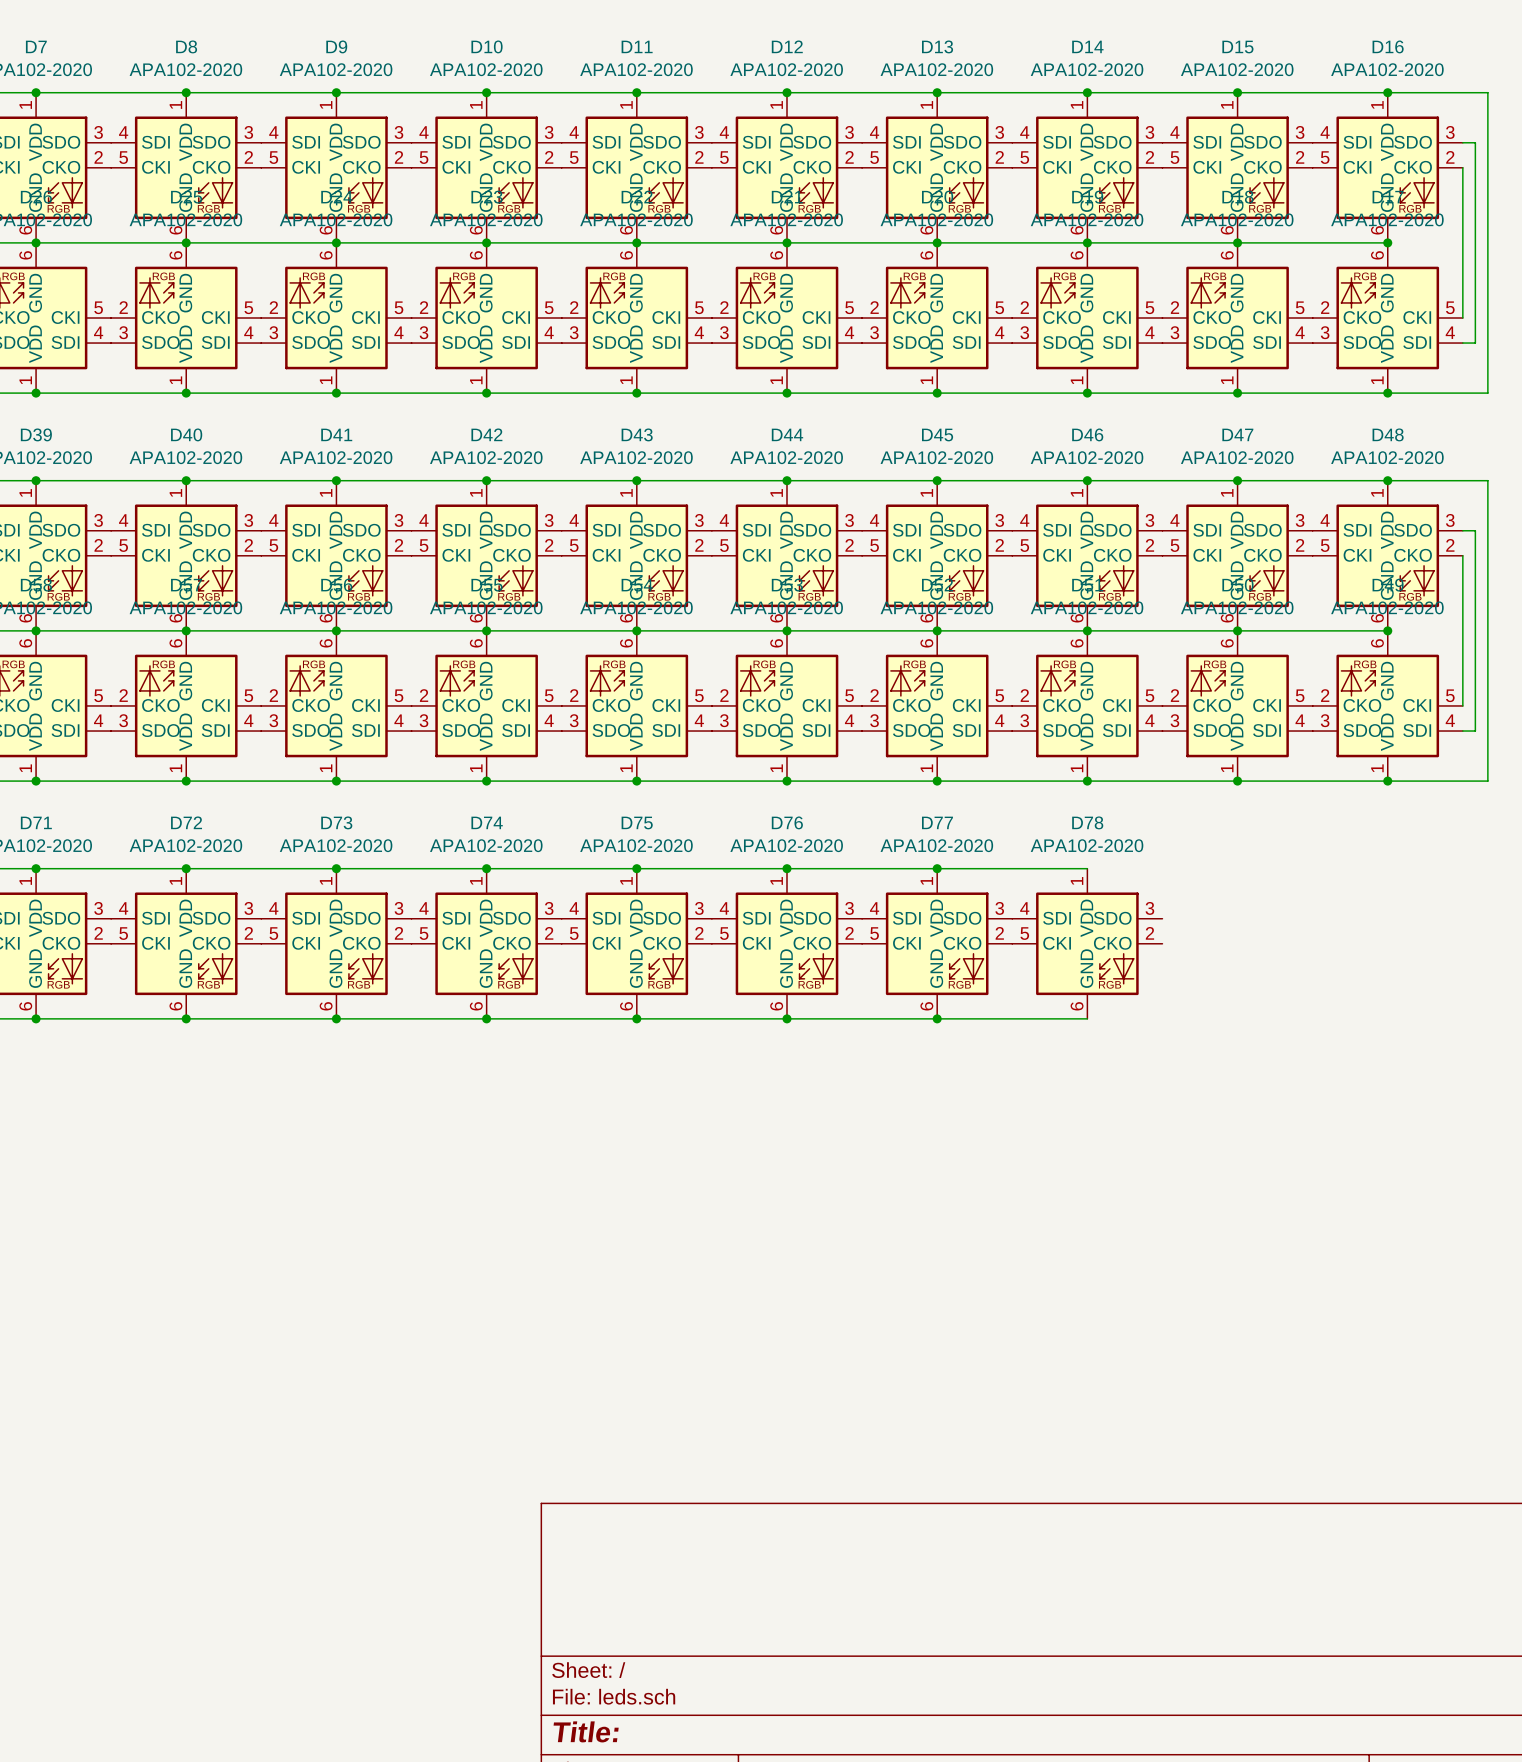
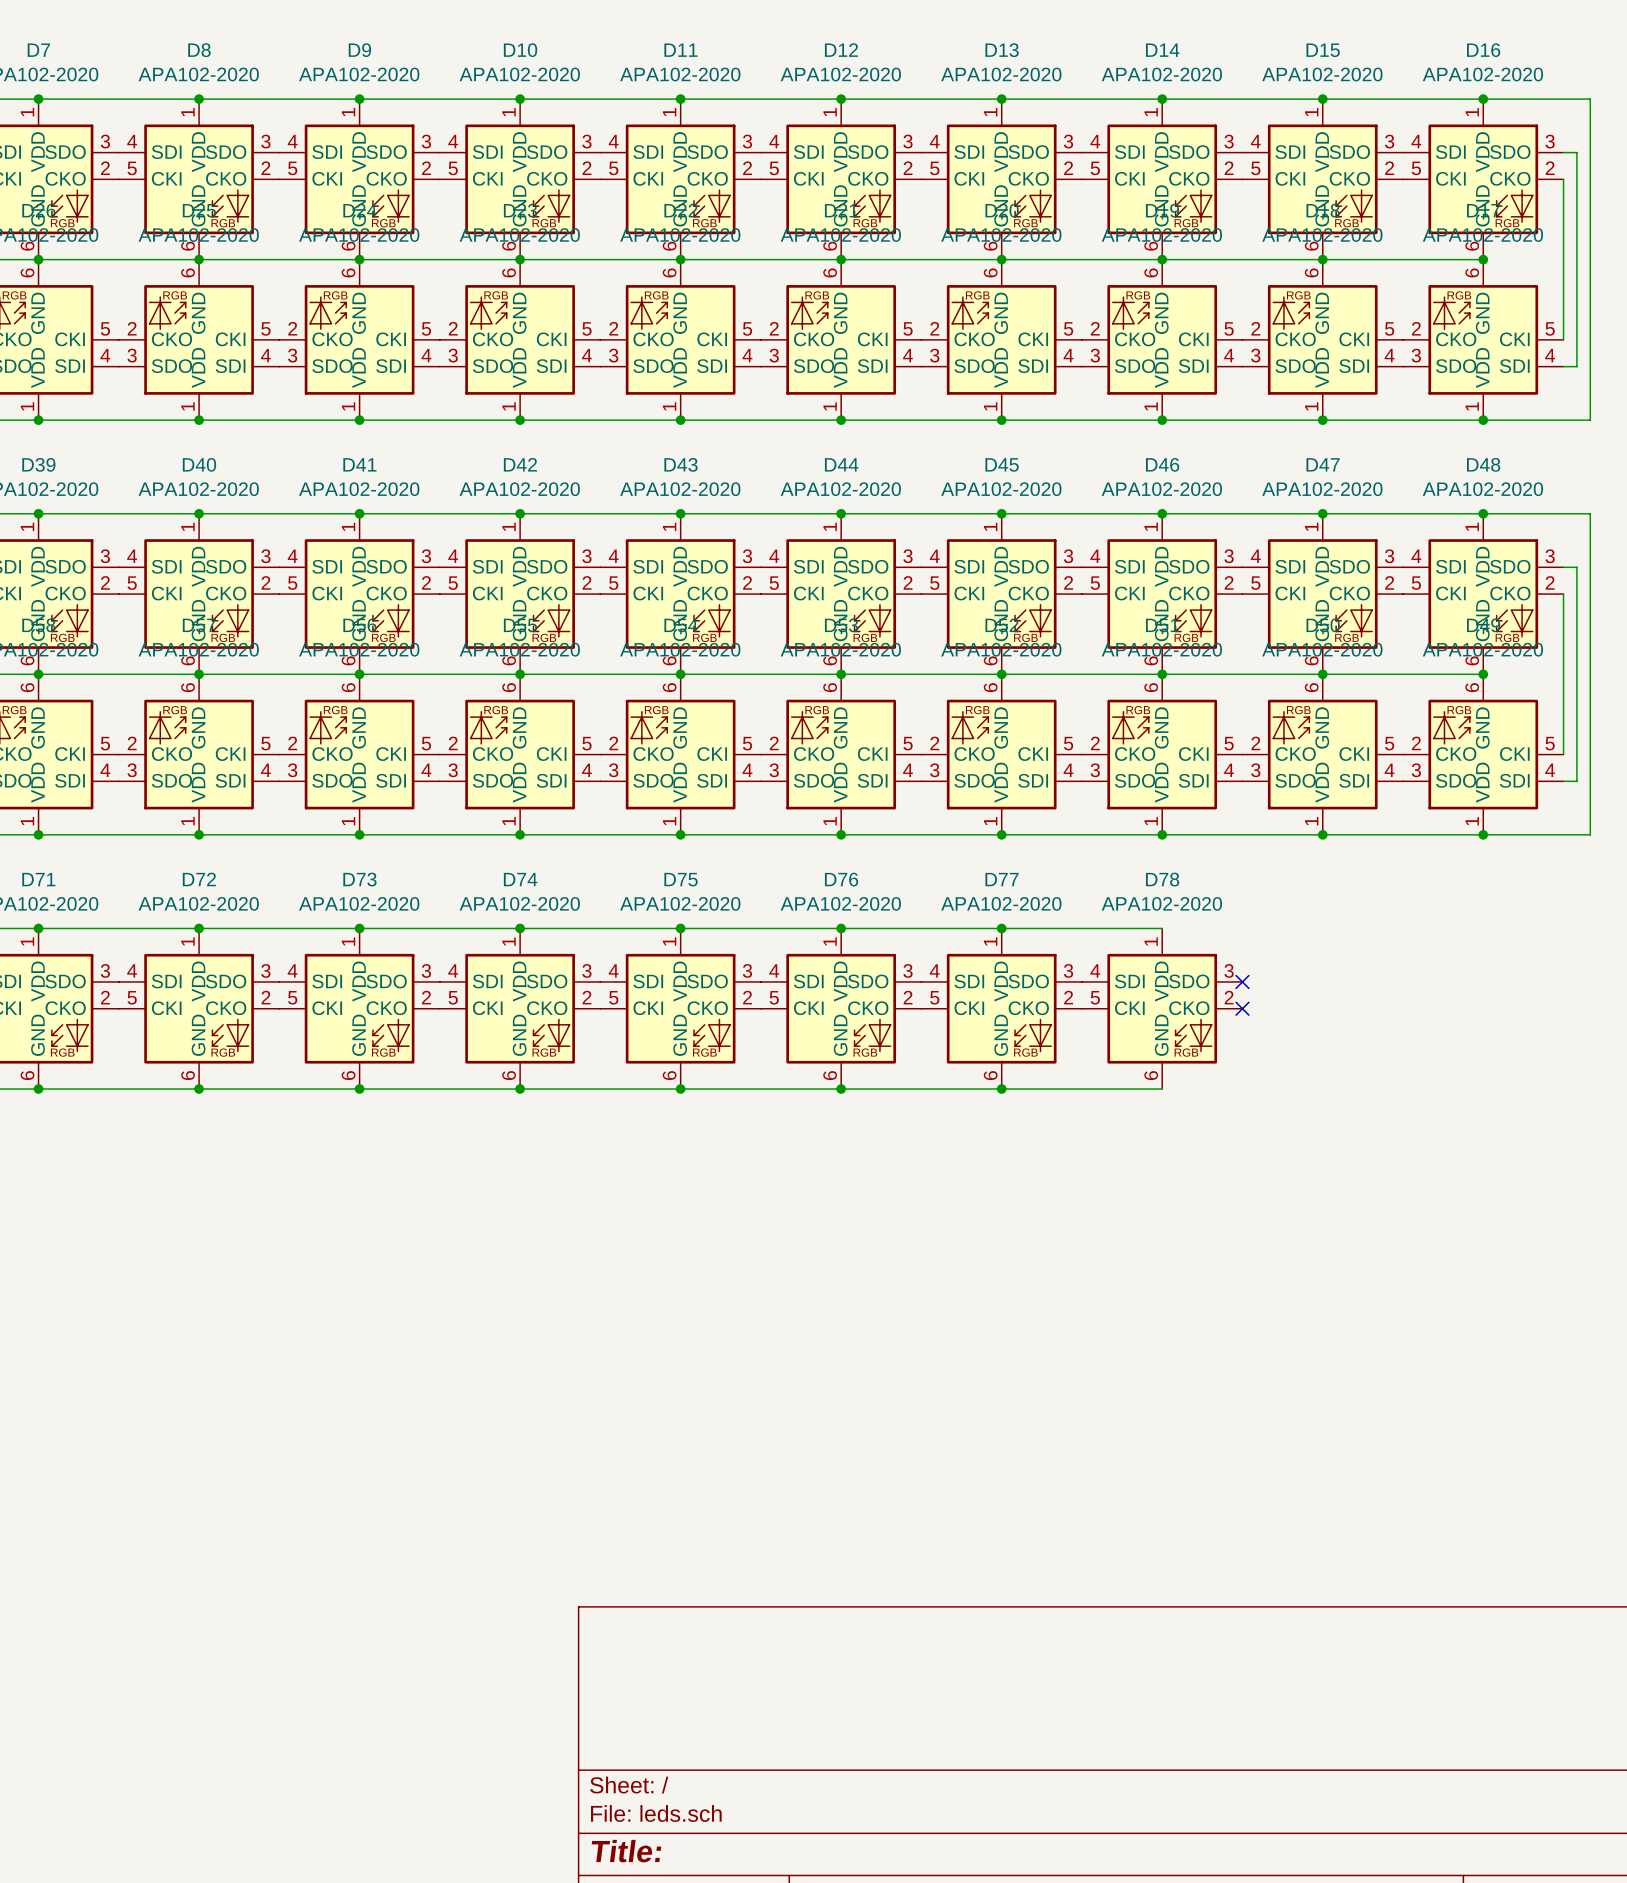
no-connect mark: none -> (1242, 981)
no-connect mark: none -> (1242, 1008)

